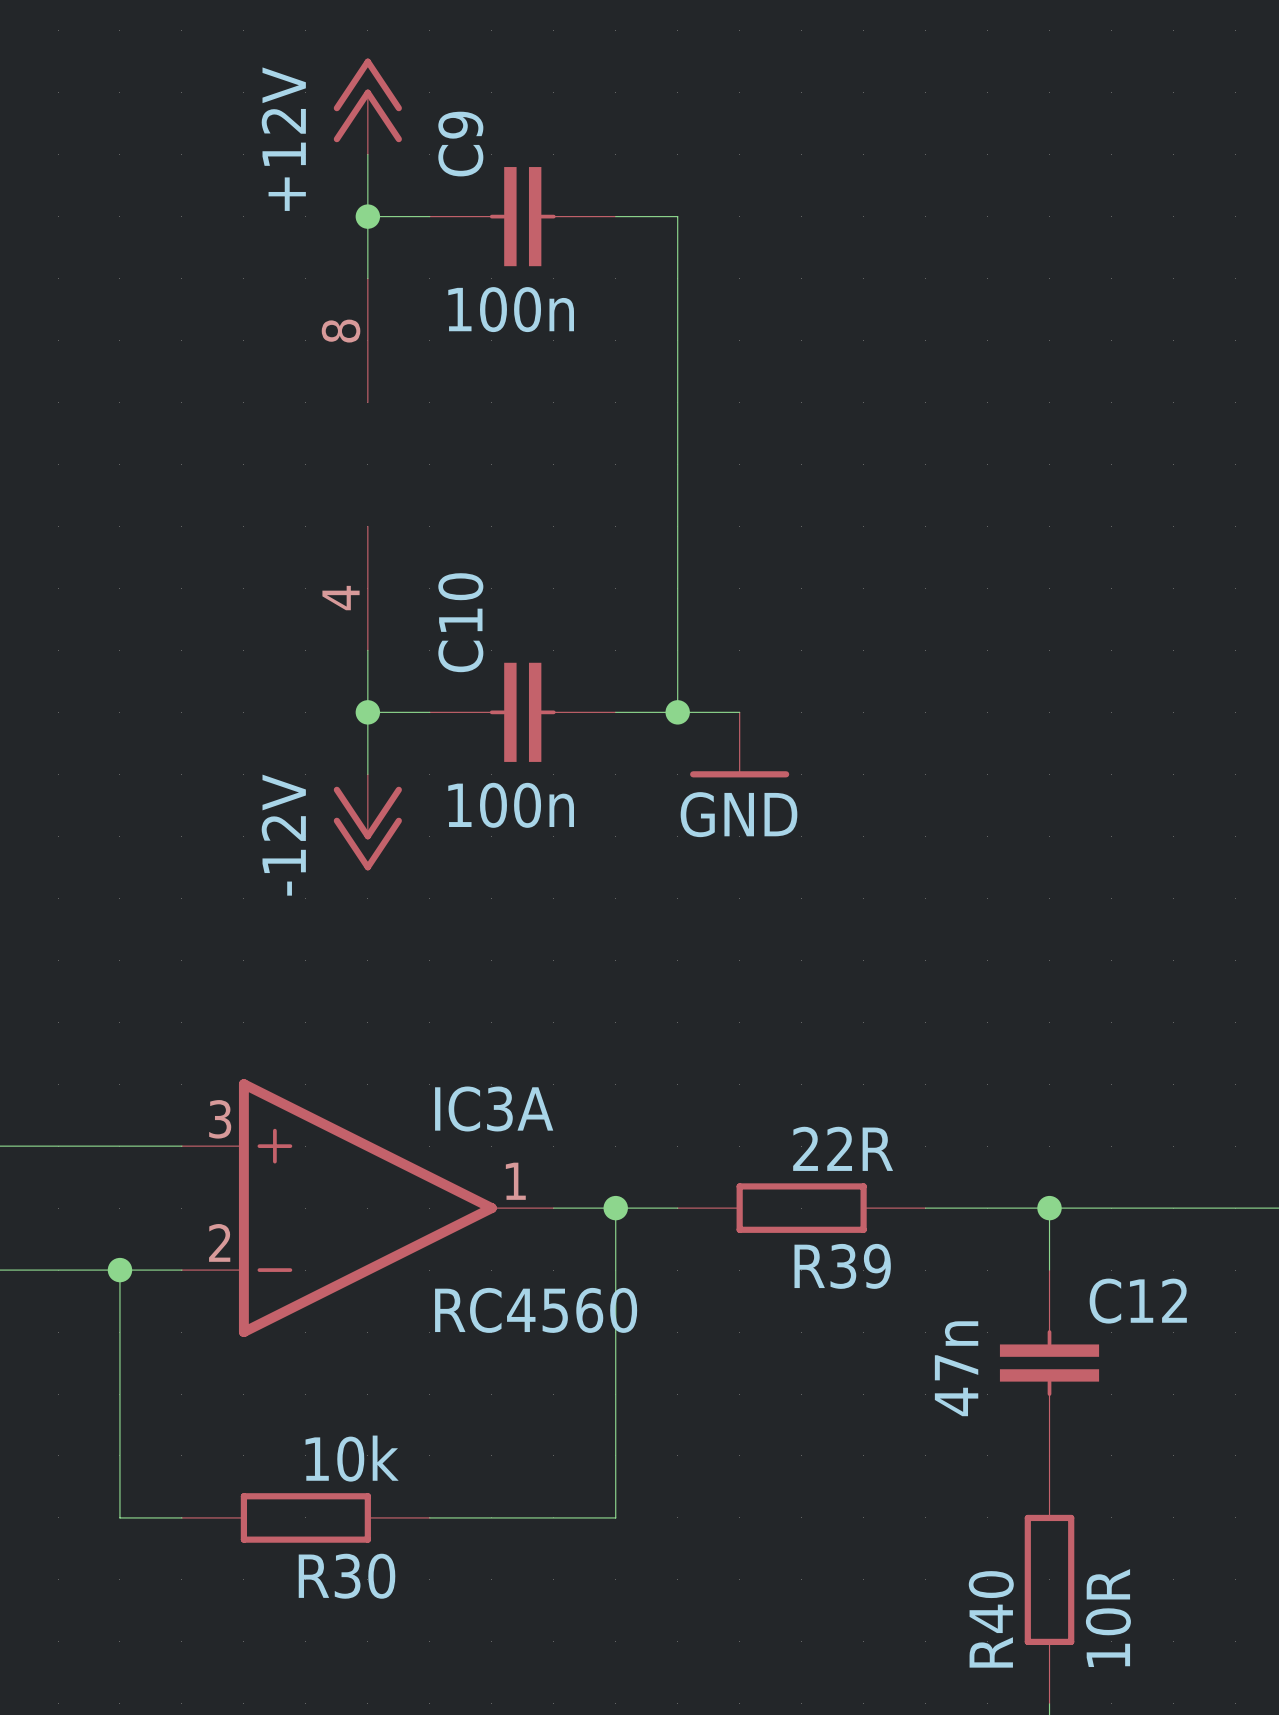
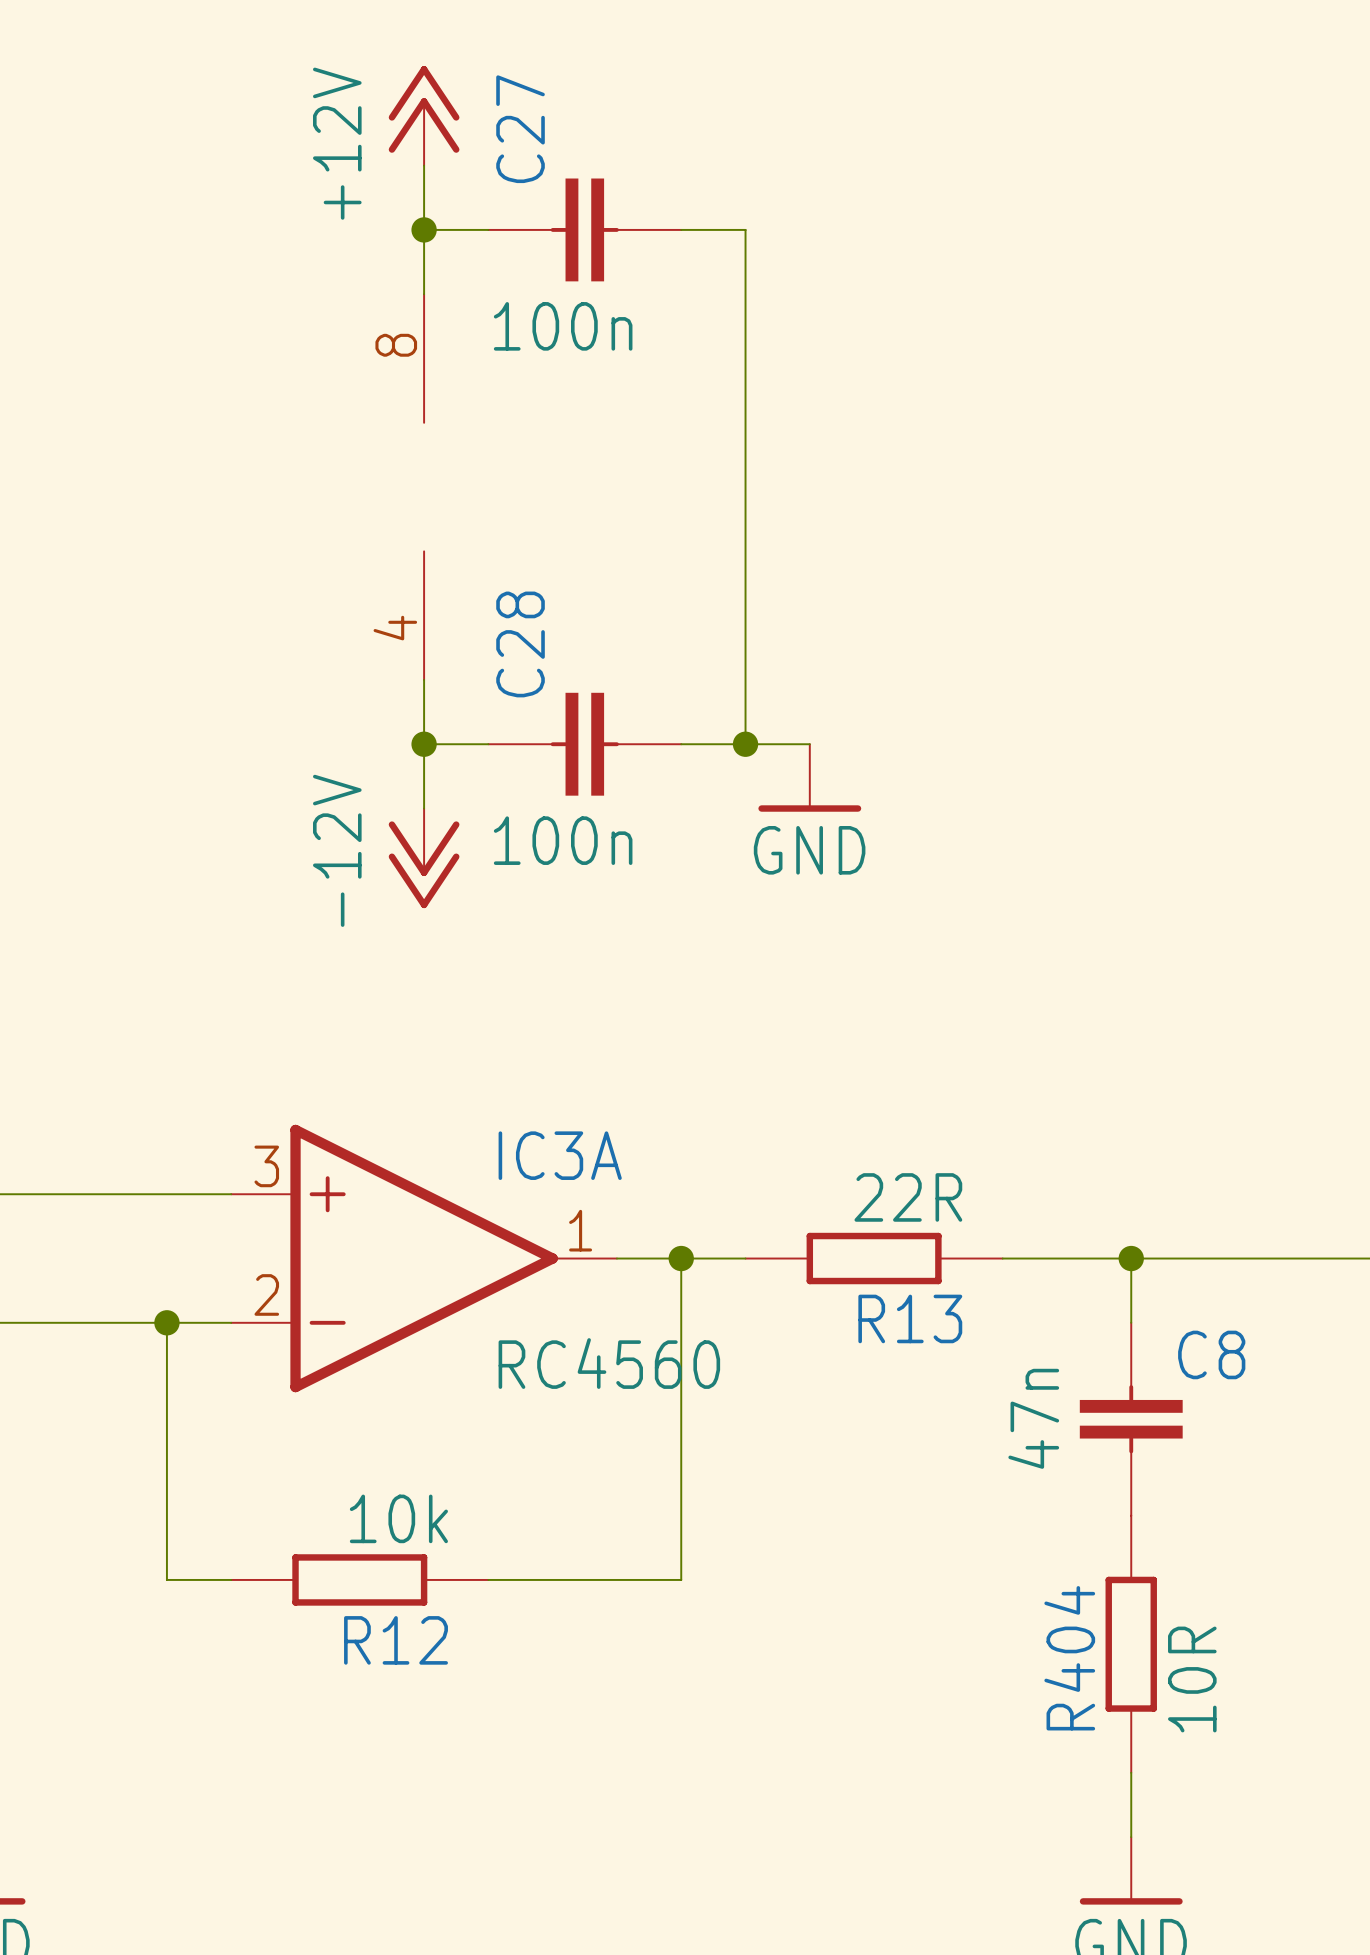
C9 name: C9 (460, 144) -> C27 (520, 129)
C10 name: C10 (460, 622) -> C28 (520, 644)
R39 name: R39 (842, 1266) -> R13 (910, 1318)
C12 name: C12 (1138, 1301) -> C8 (1211, 1354)
R30 name: R30 (347, 1576) -> R12 (396, 1640)
R40 name: R40 (991, 1619) -> R404 (1069, 1658)

